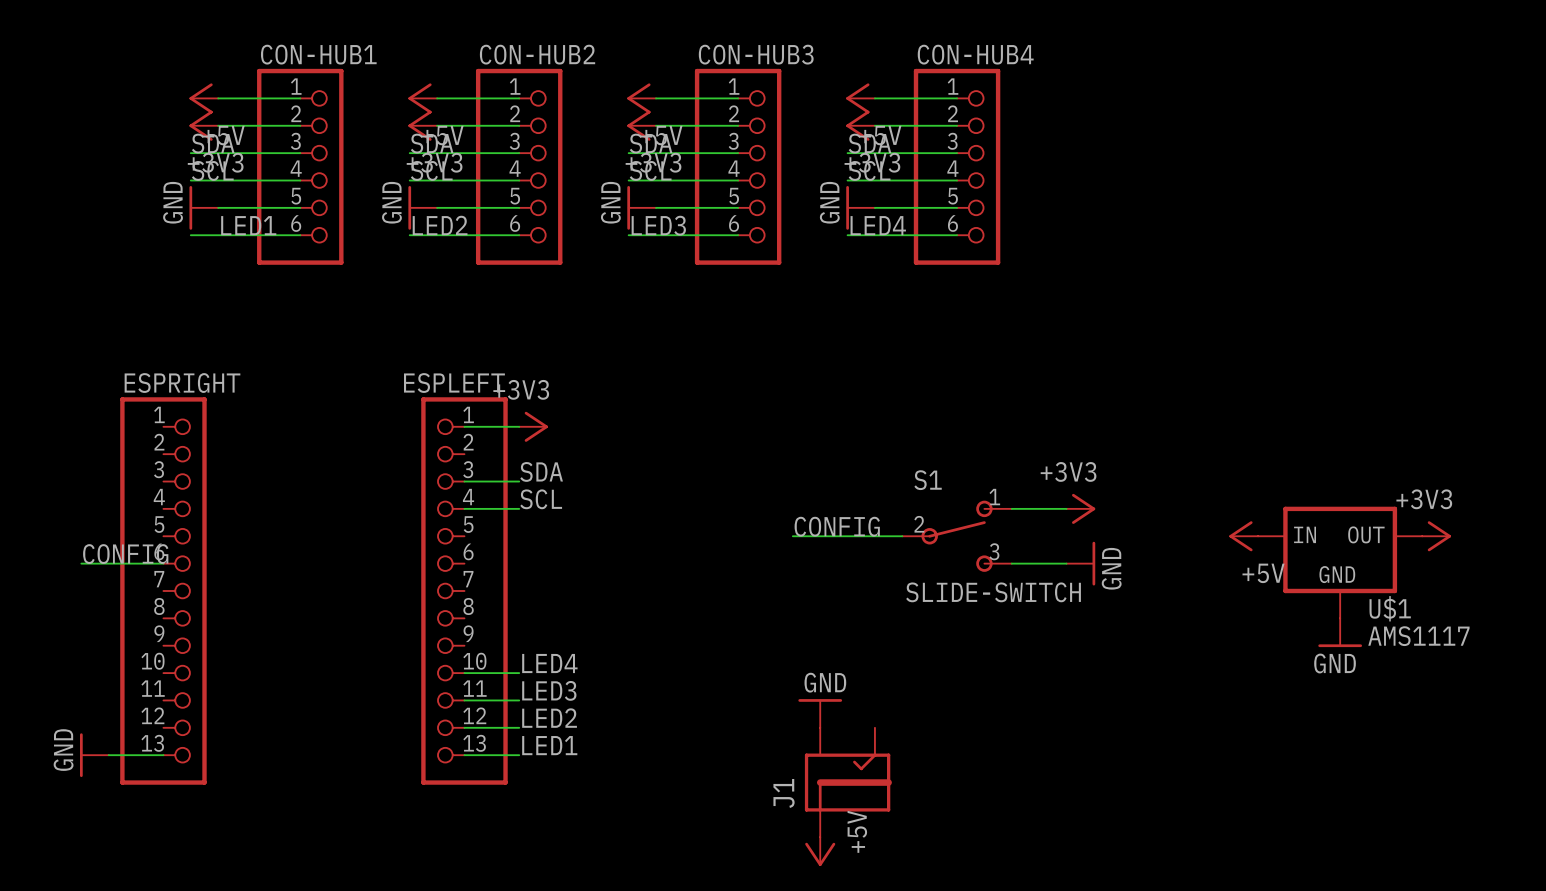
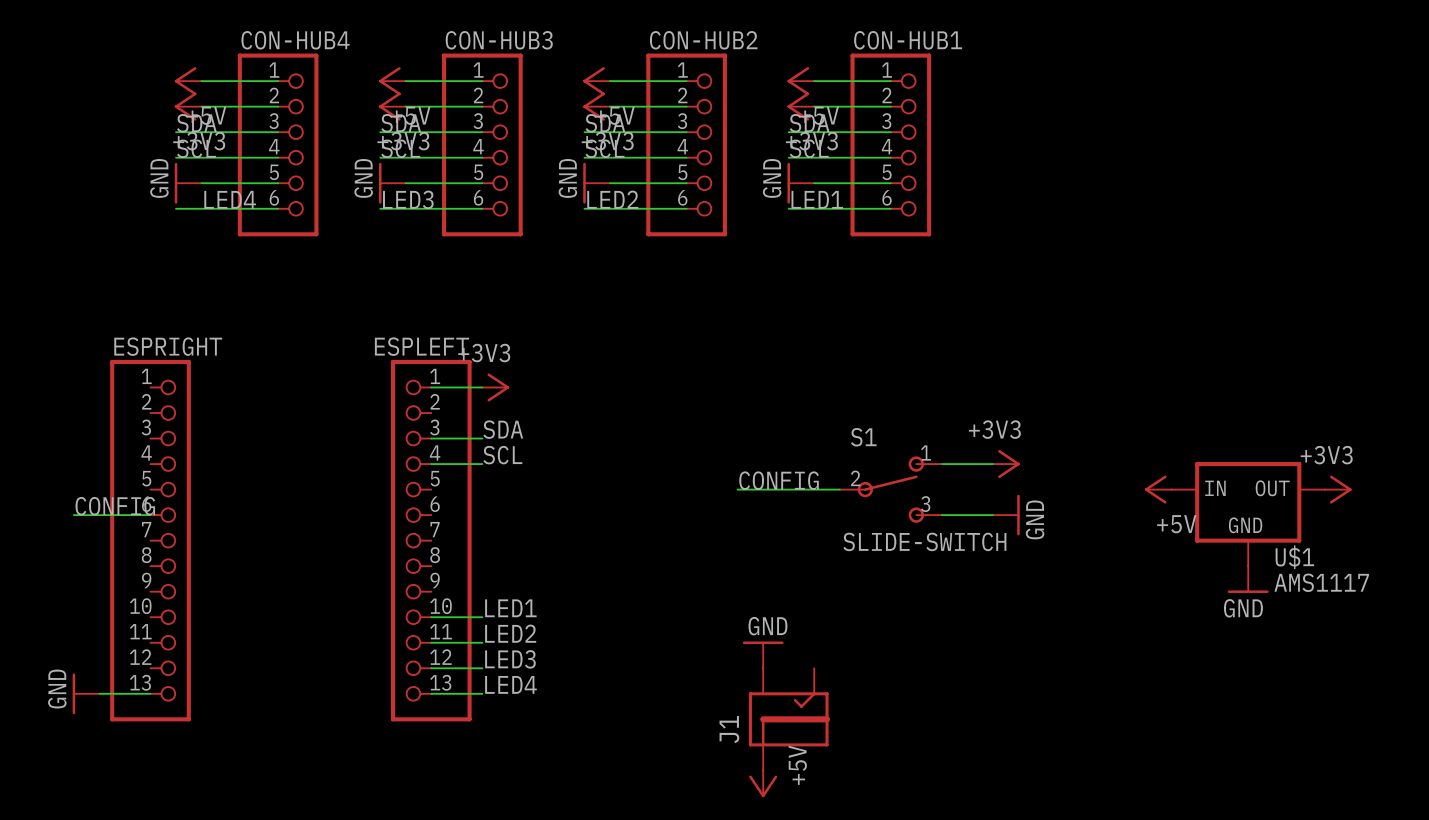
CON-HUB1 name: CON-HUB1 (318, 54) -> CON-HUB4 (295, 40)
CON-HUB2 name: CON-HUB2 (537, 54) -> CON-HUB3 (499, 40)
CON-HUB3 name: CON-HUB3 (756, 54) -> CON-HUB2 (703, 40)
CON-HUB4 name: CON-HUB4 (975, 54) -> CON-HUB1 (908, 40)
label: LED1 (248, 225) -> LED4 (230, 199)
label: LED2 (440, 225) -> LED3 (408, 199)
label: LED3 (658, 225) -> LED2 (612, 199)
label: LED4 (878, 225) -> LED1 (817, 199)
label: LED4 (549, 663) -> LED1 (510, 608)
label: LED3 (549, 690) -> LED2 (510, 633)
label: LED2 (549, 718) -> LED3 (510, 659)
label: LED1 (549, 745) -> LED4 (510, 684)

